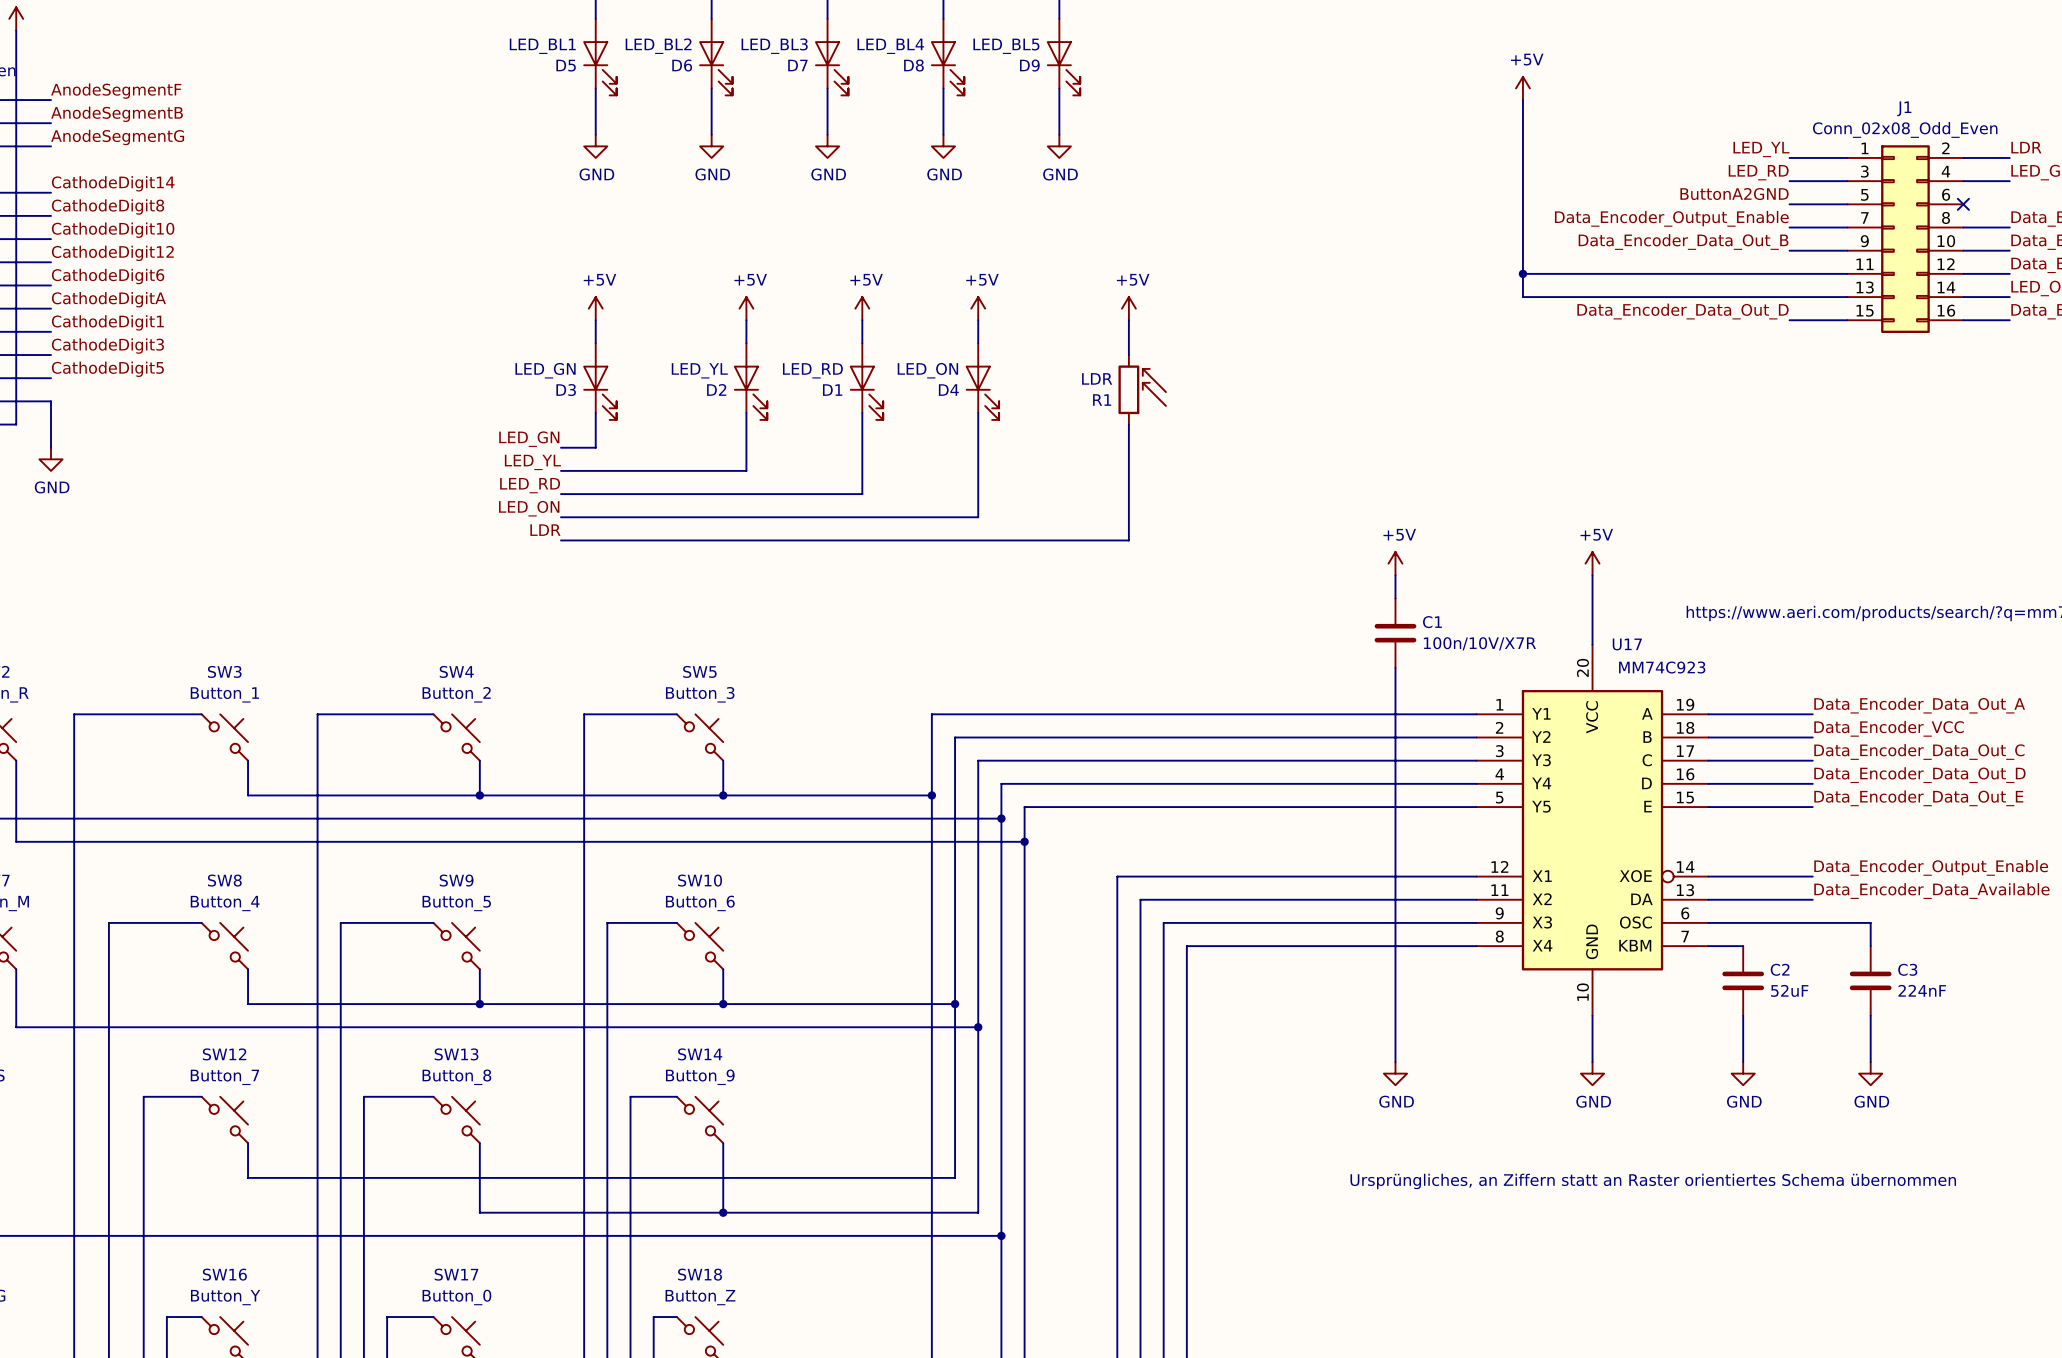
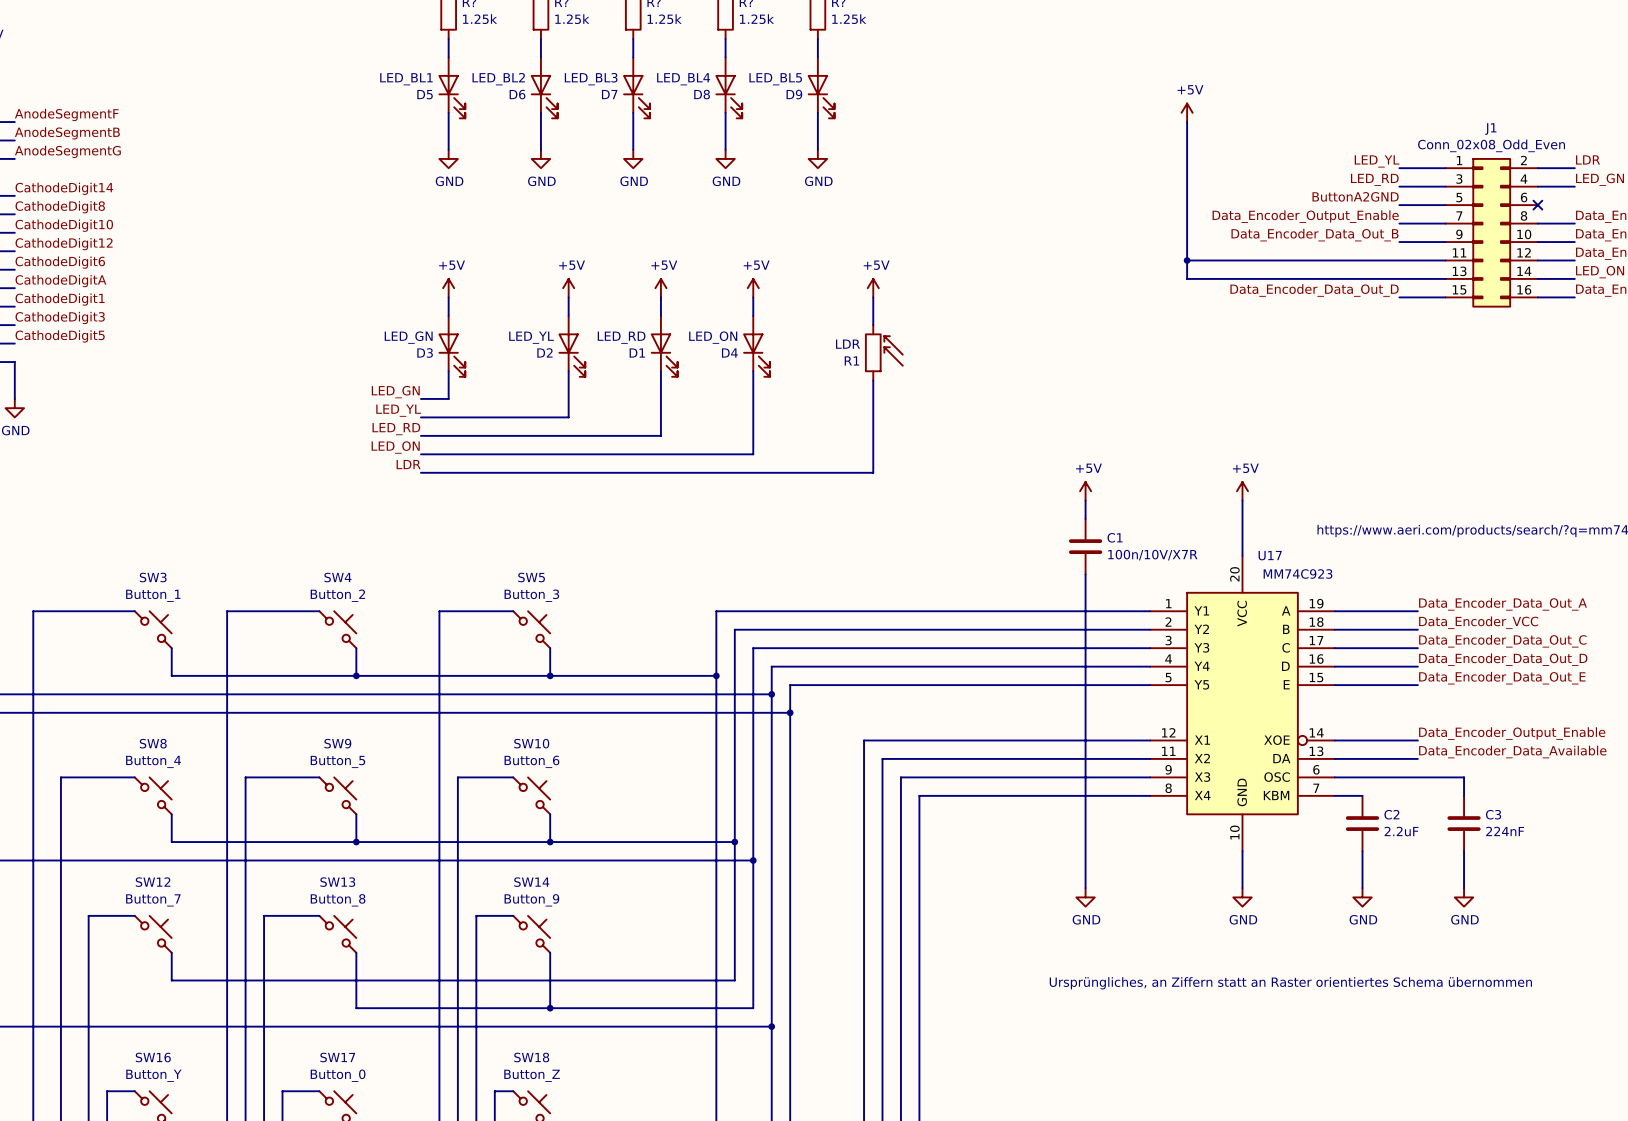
C2 value: 52uF (1789, 990) -> 2.2uF (1401, 831)

